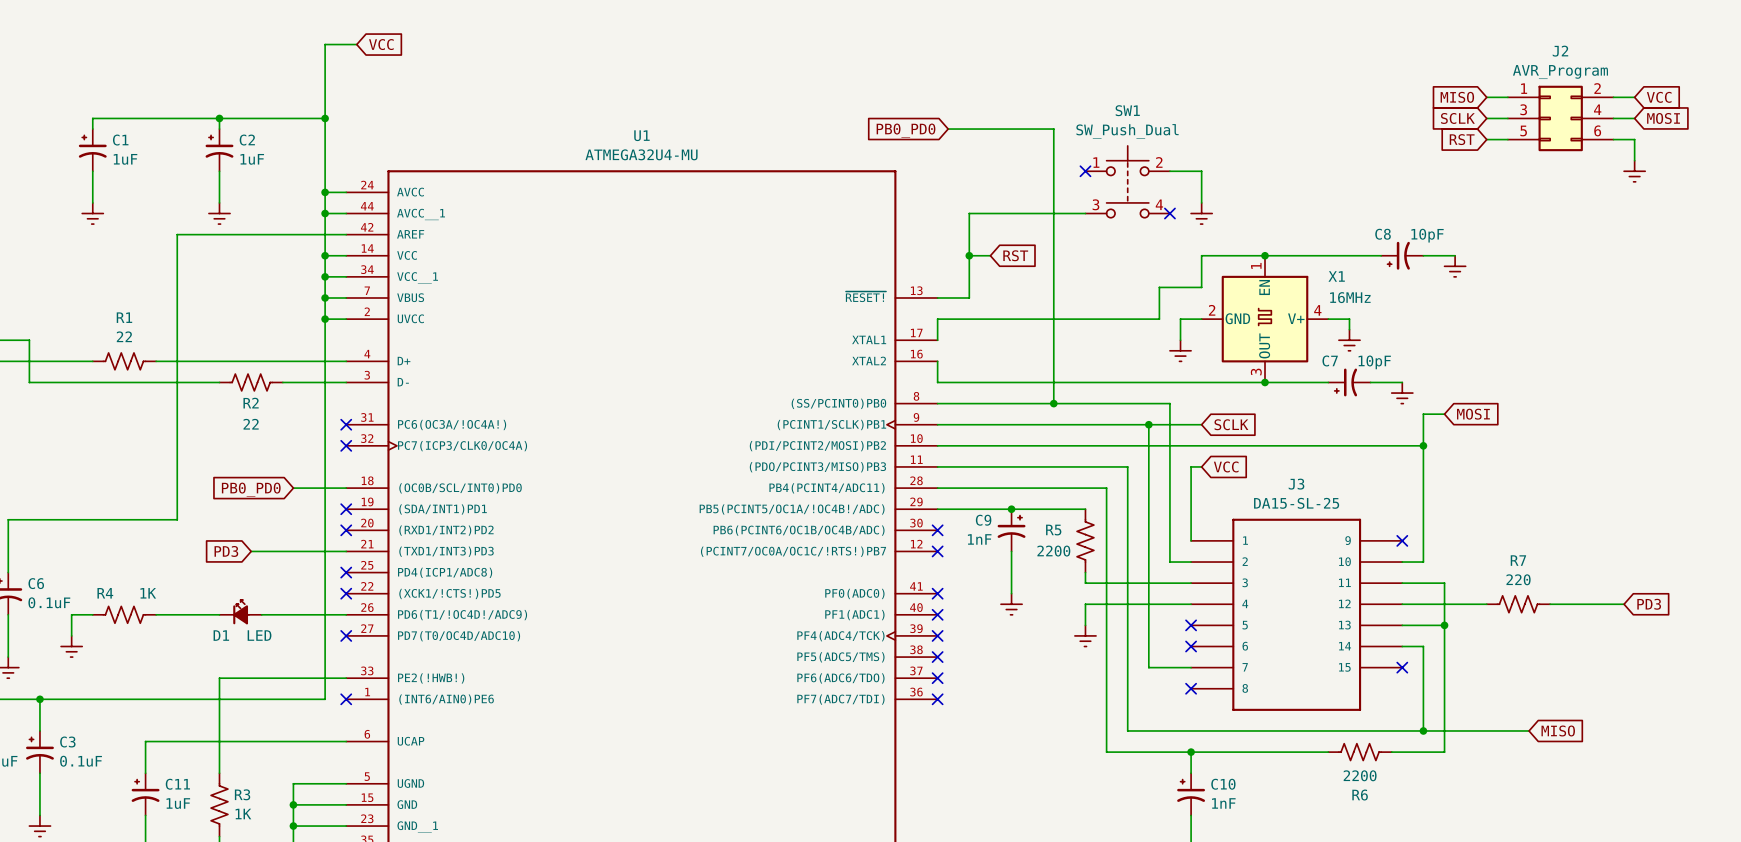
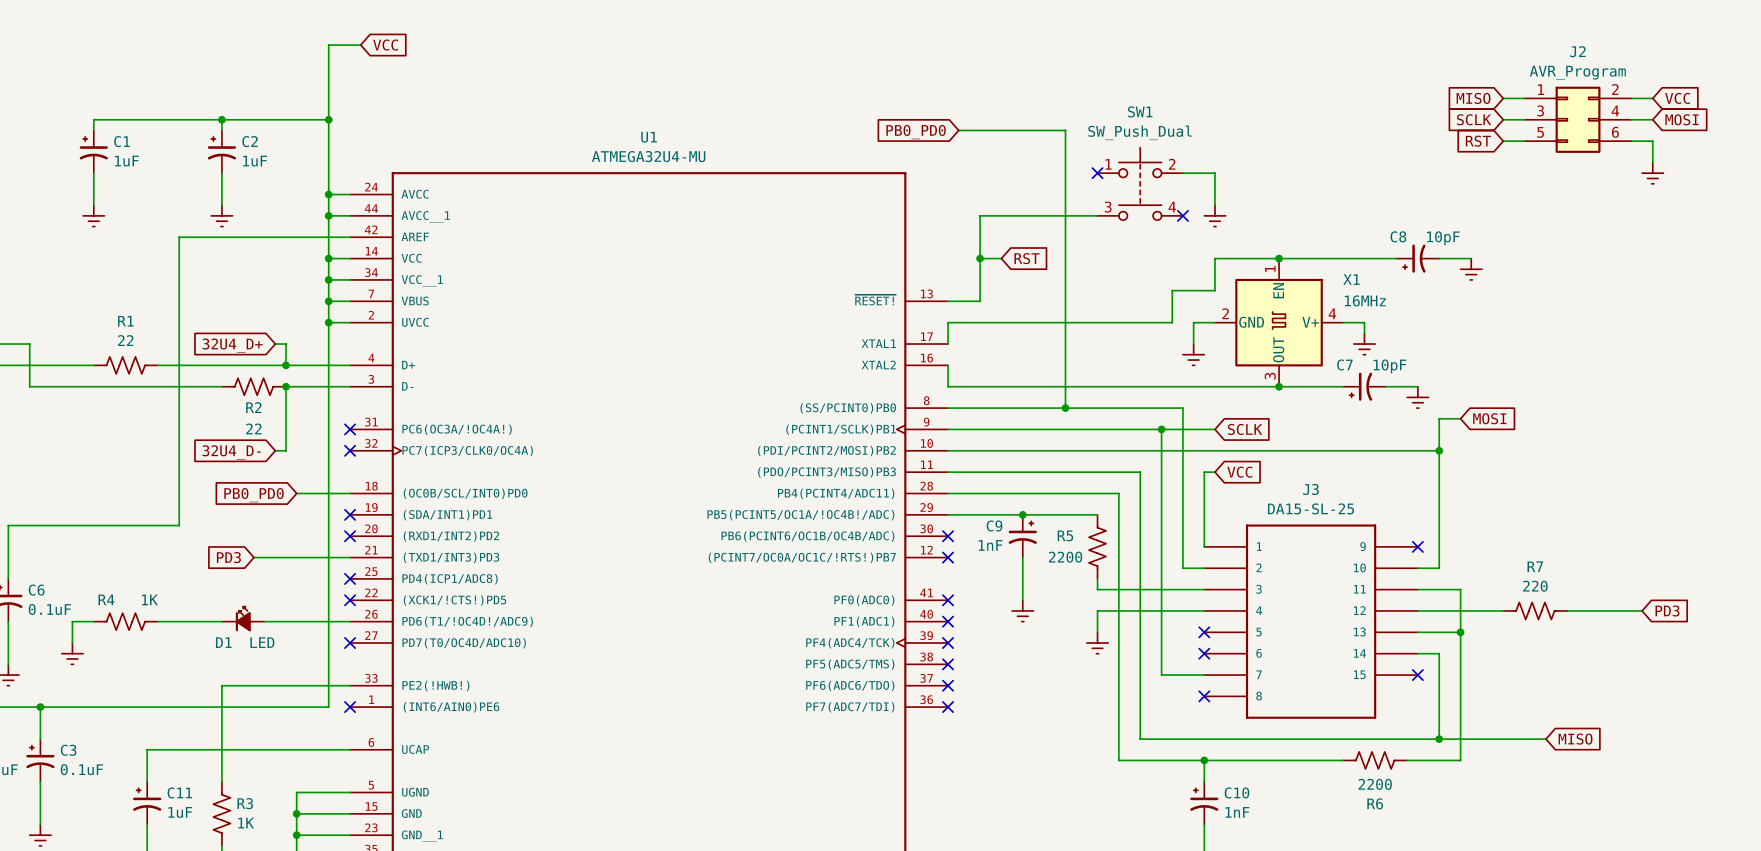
wire: none -> (275, 344) (286, 344) (286, 365)
global label: none -> 32U4_D+ (232, 345)
junction: none -> (286, 365)
wire: none -> (286, 386) (286, 450) (275, 450)
junction: none -> (286, 386)
global label: none -> 32U4_D- (231, 452)

